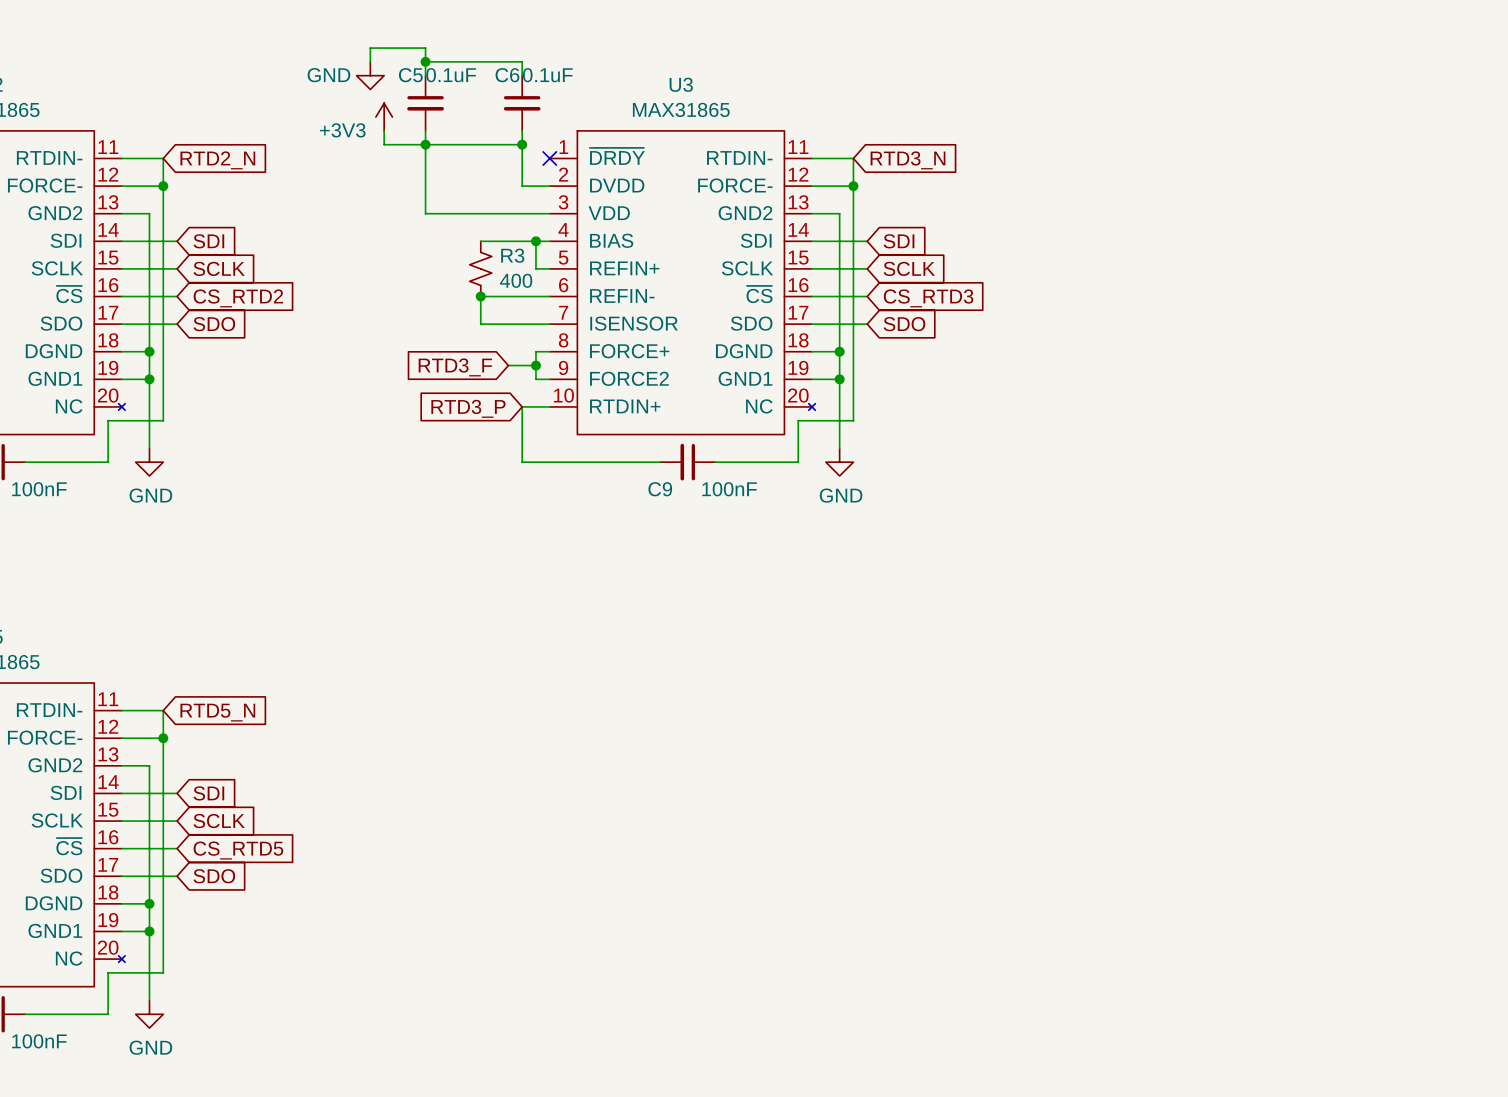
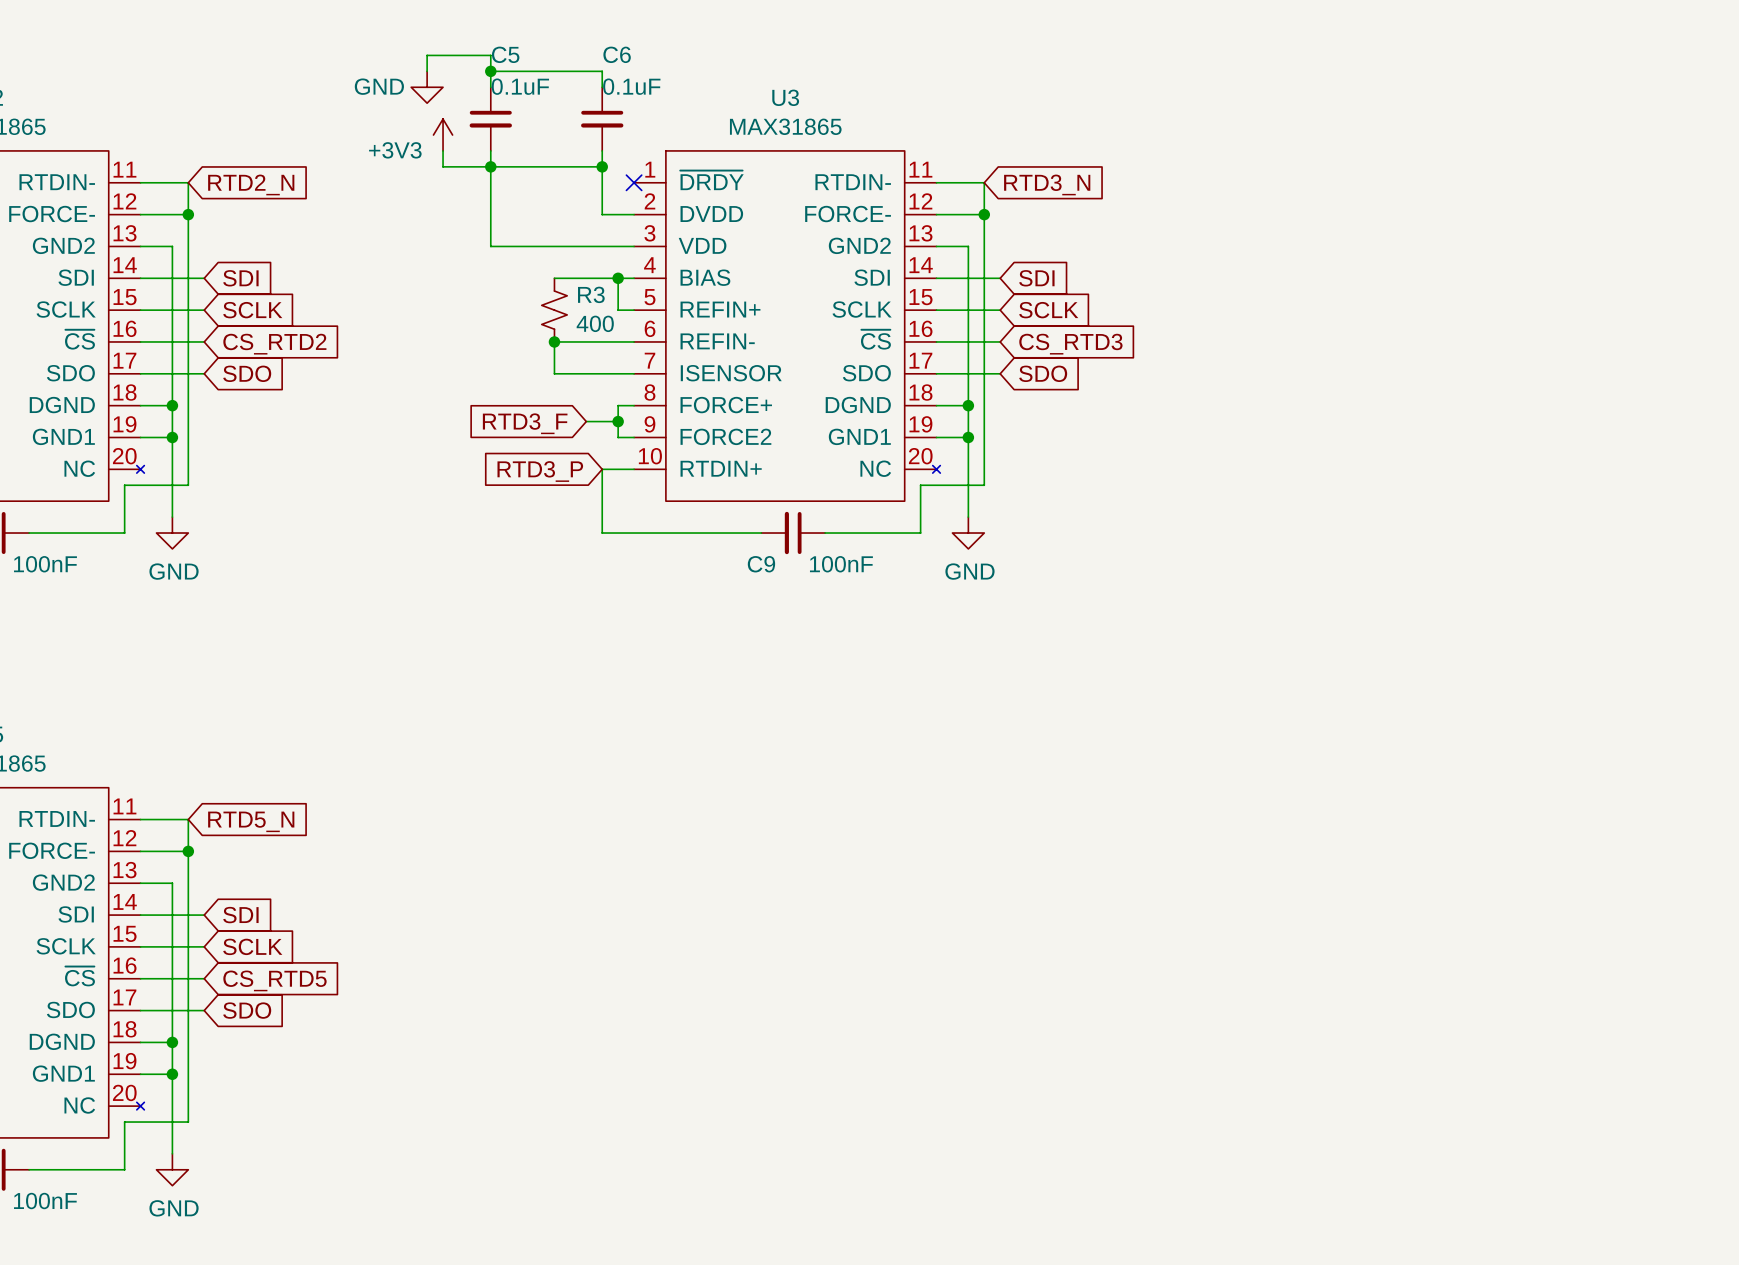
C5 name position: C5 (410, 75) -> C5 (505, 54)
C6 name position: C6 (507, 75) -> C6 (617, 54)

